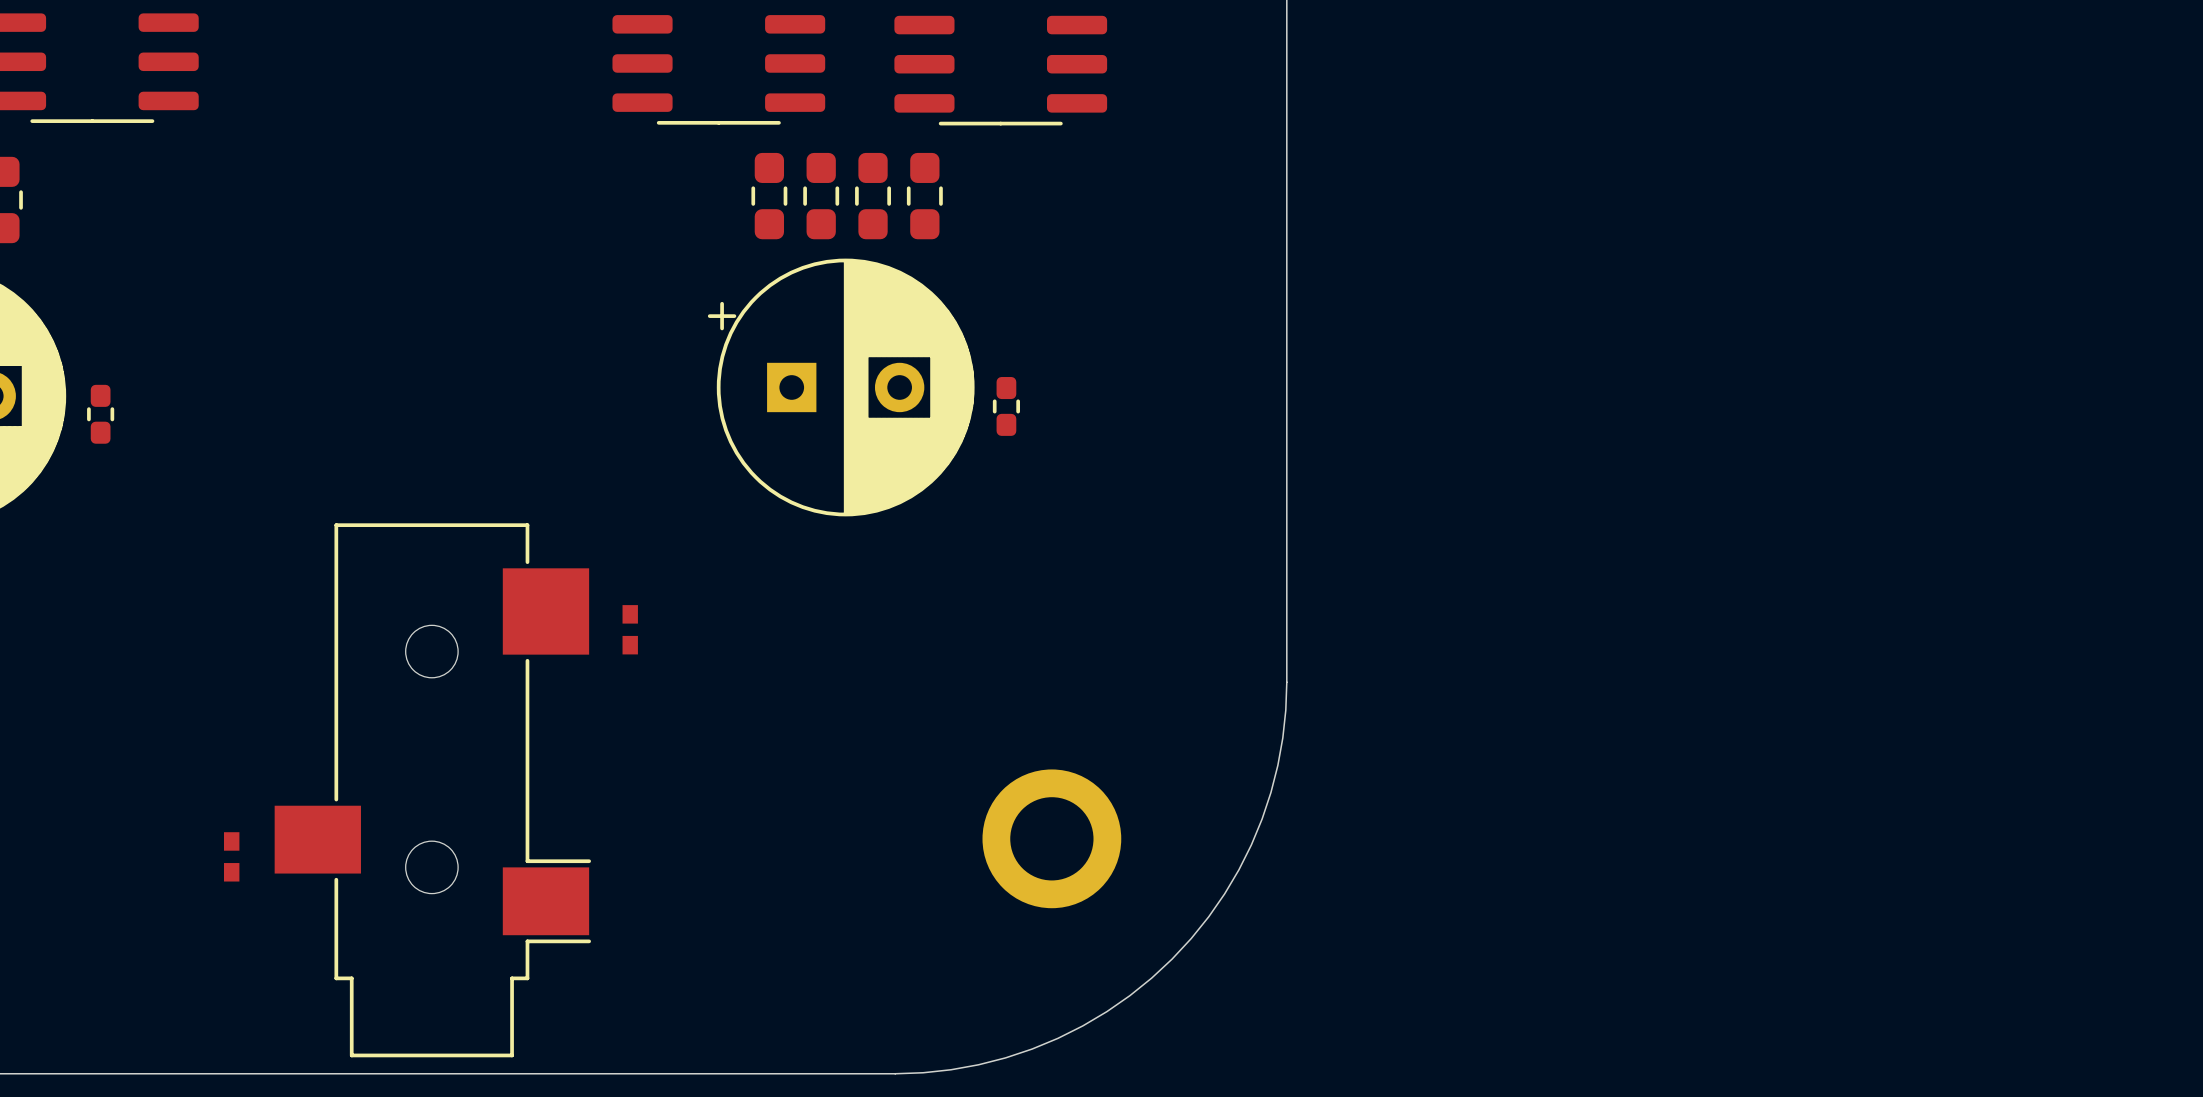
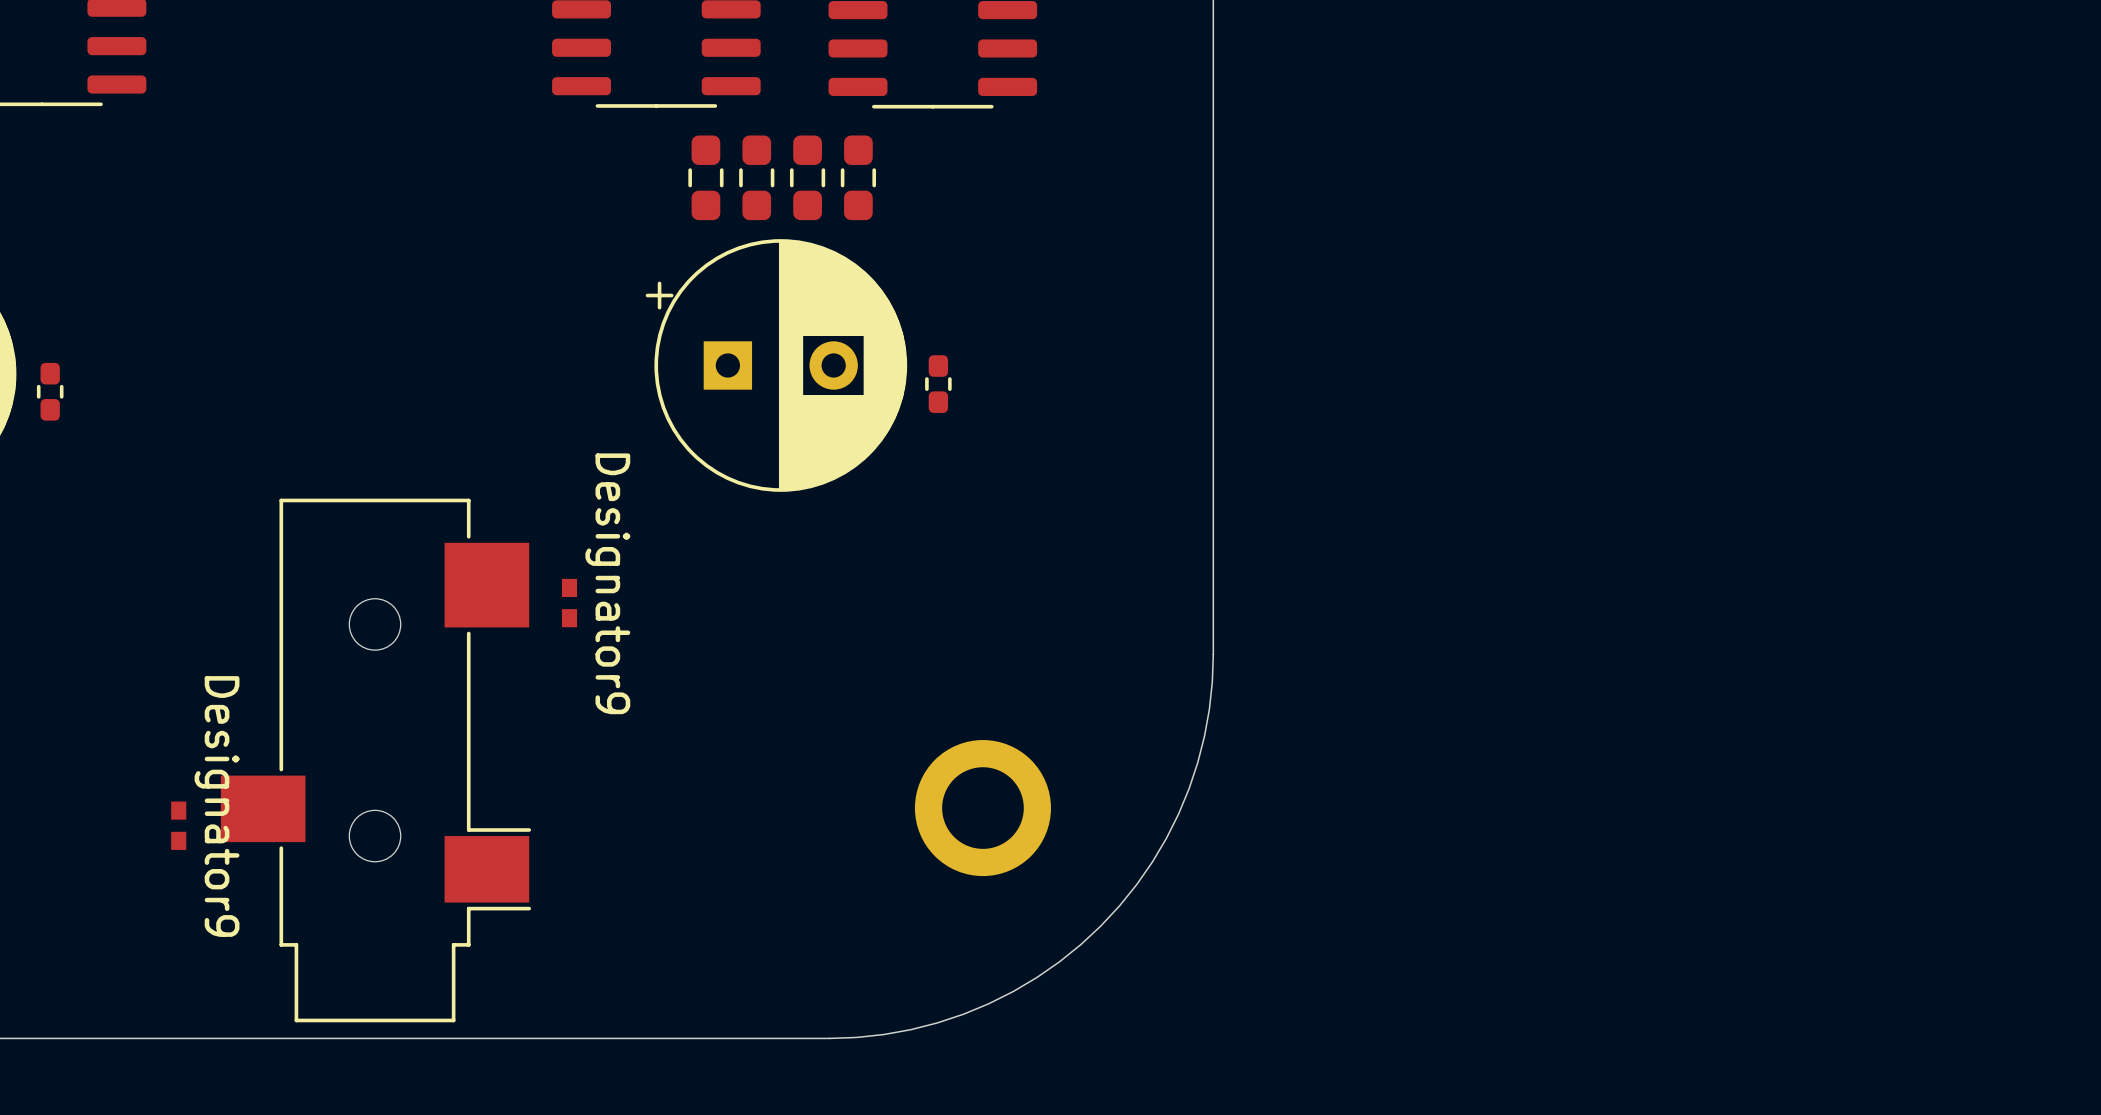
part text: none -> Designator9 (607, 583)
part text: none -> Designator9 (217, 806)

